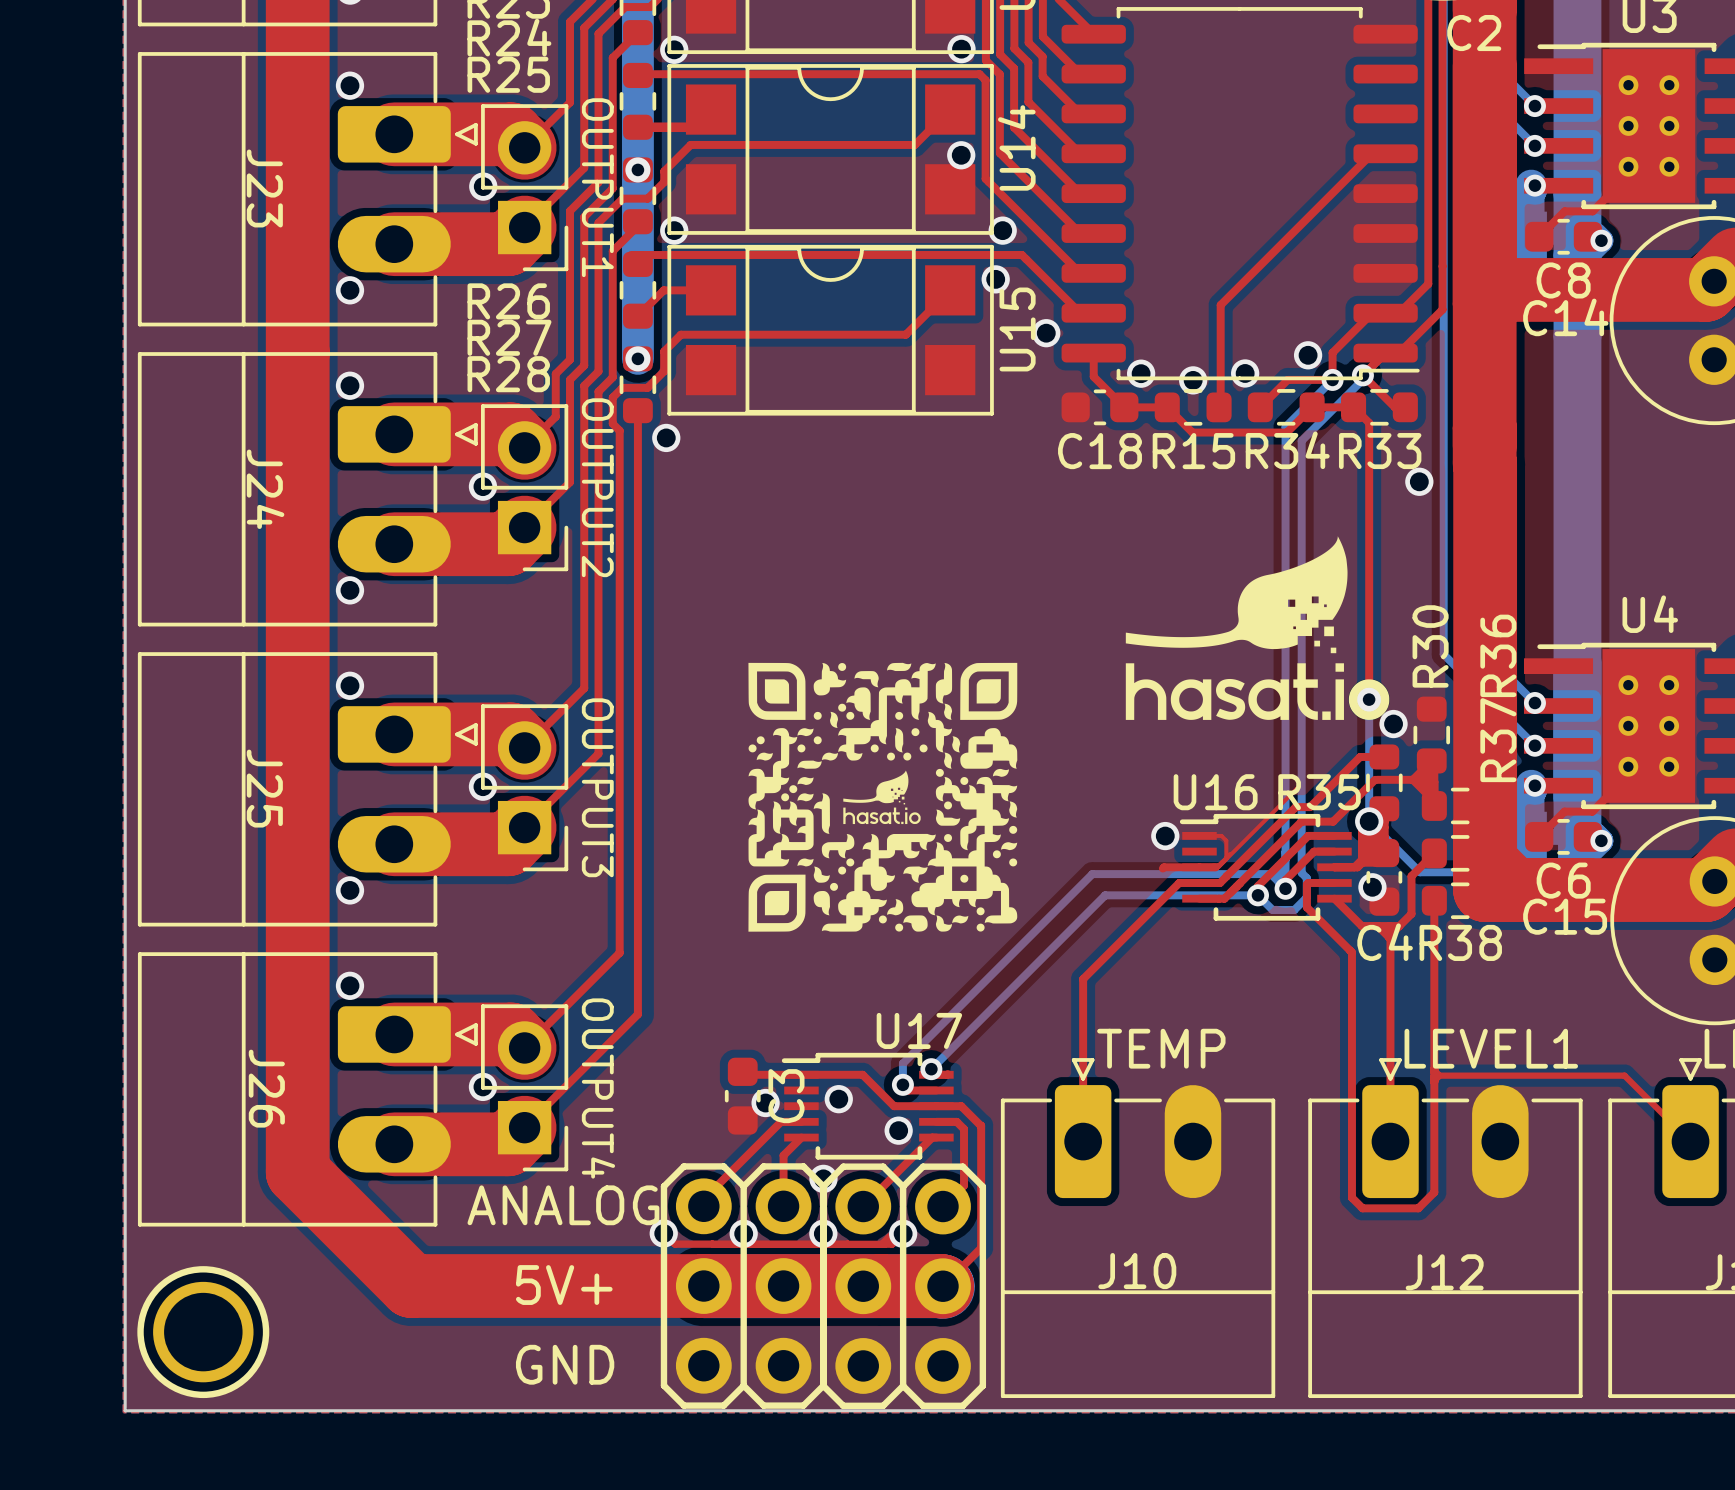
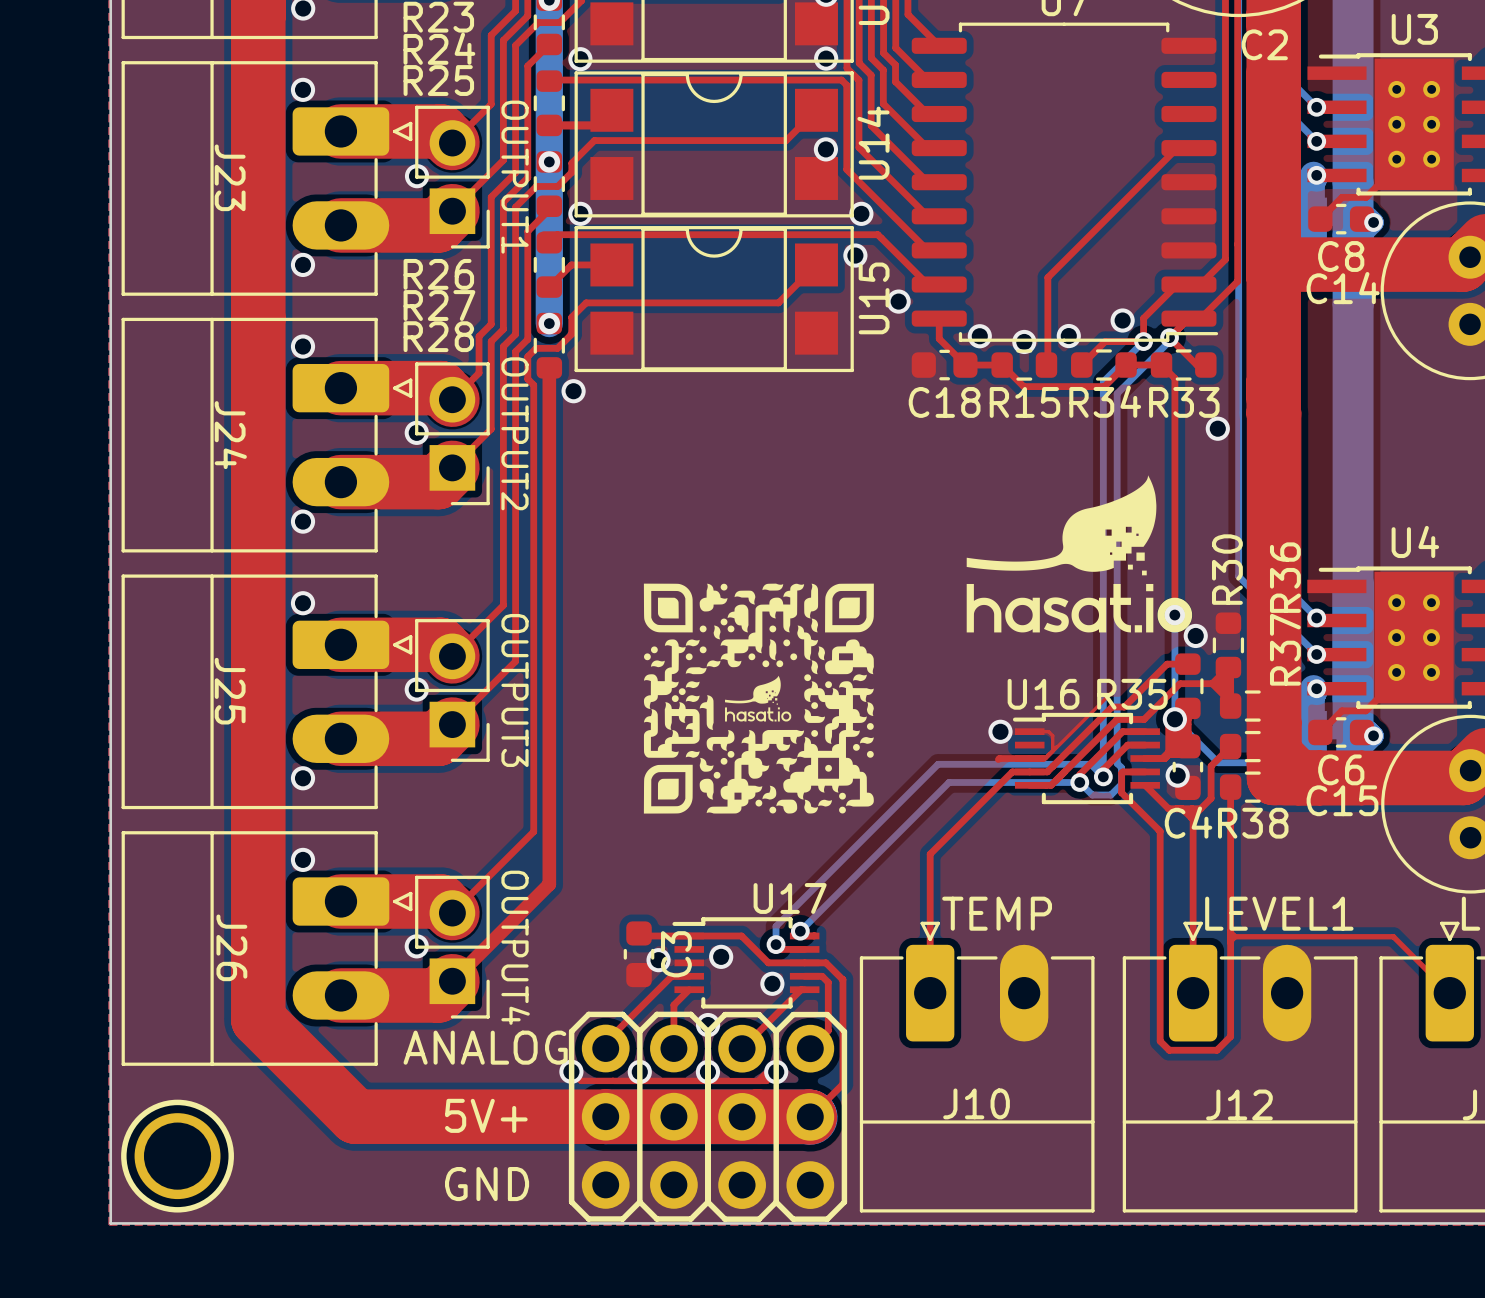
top track width: thin (637, 410) (637, 1014) (524, 1127) -> thick (549, 367) (549, 884) (452, 981)

